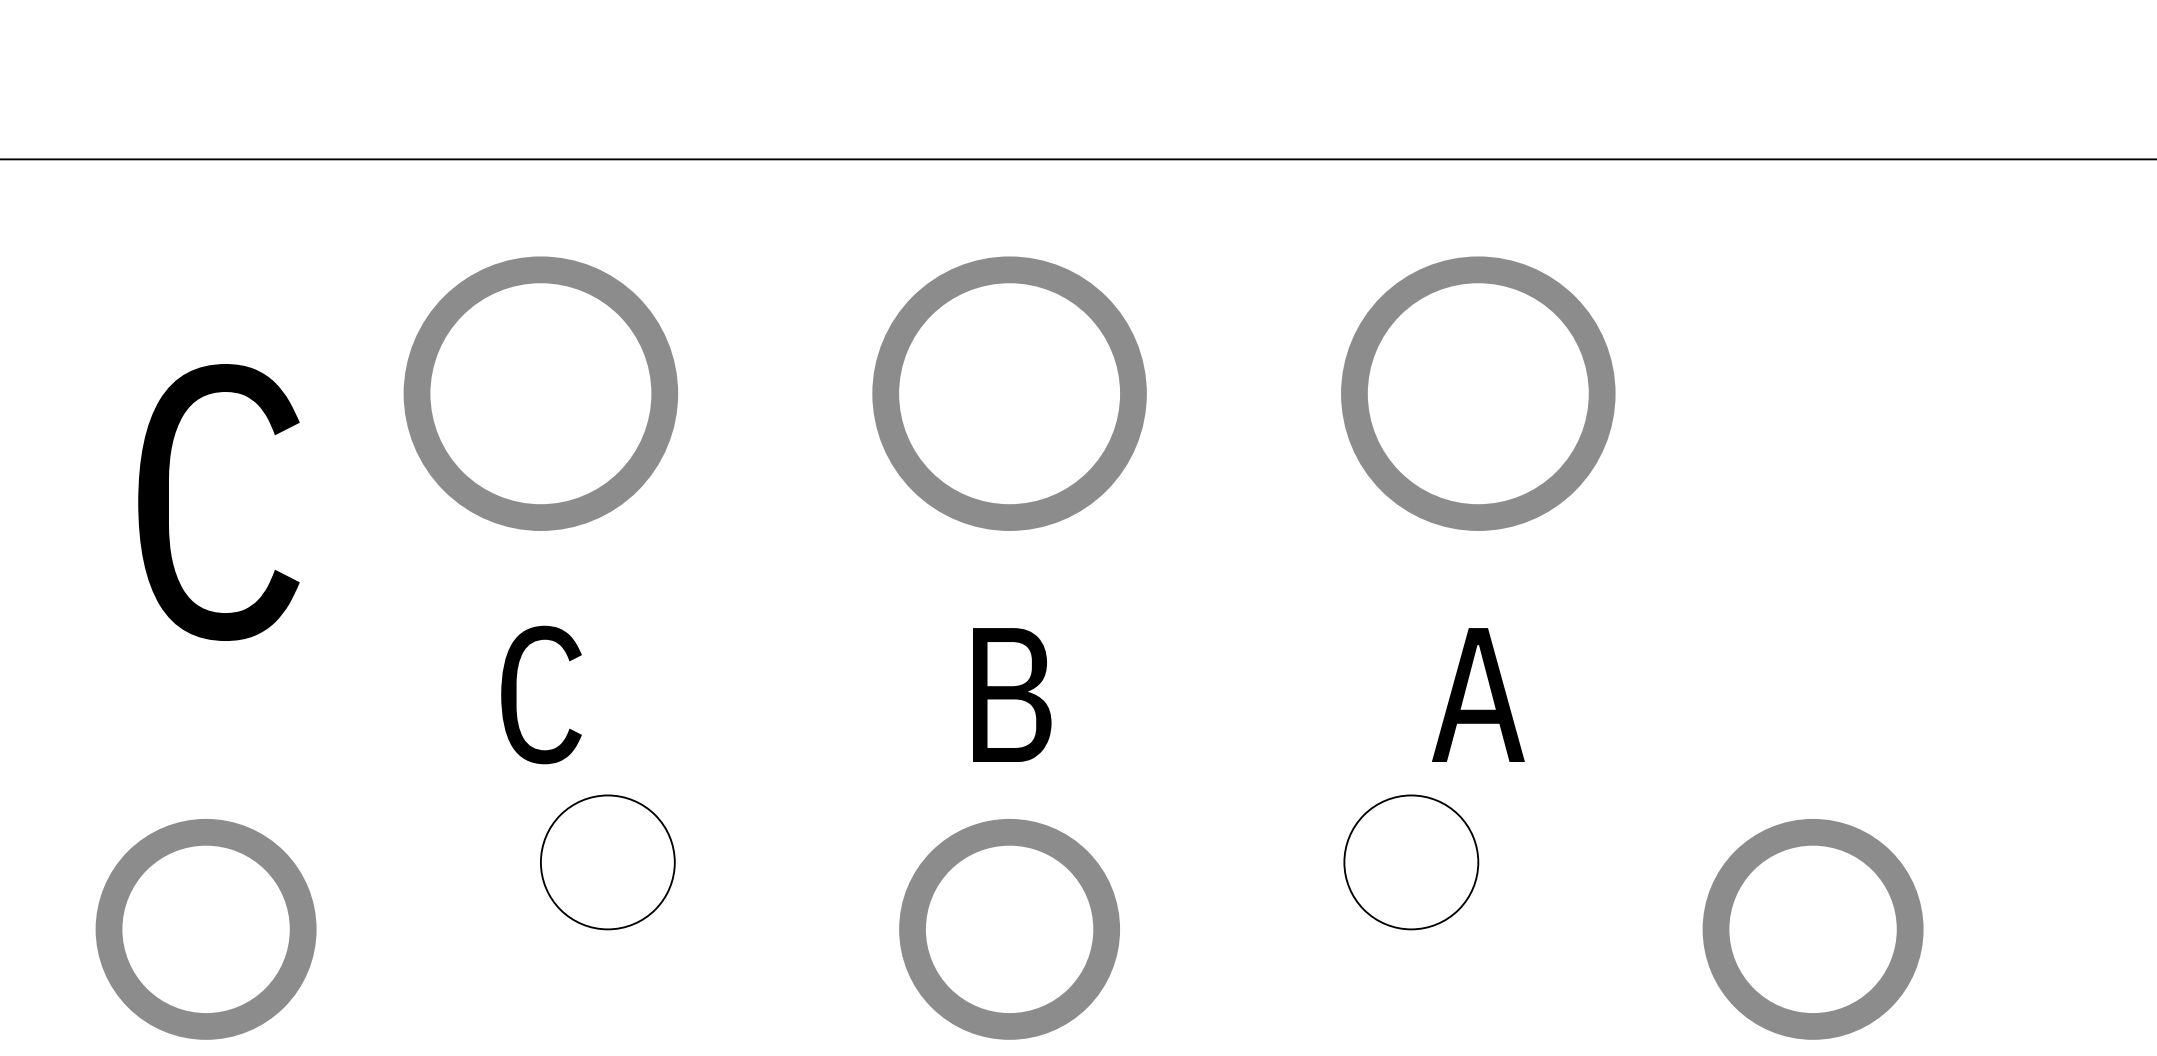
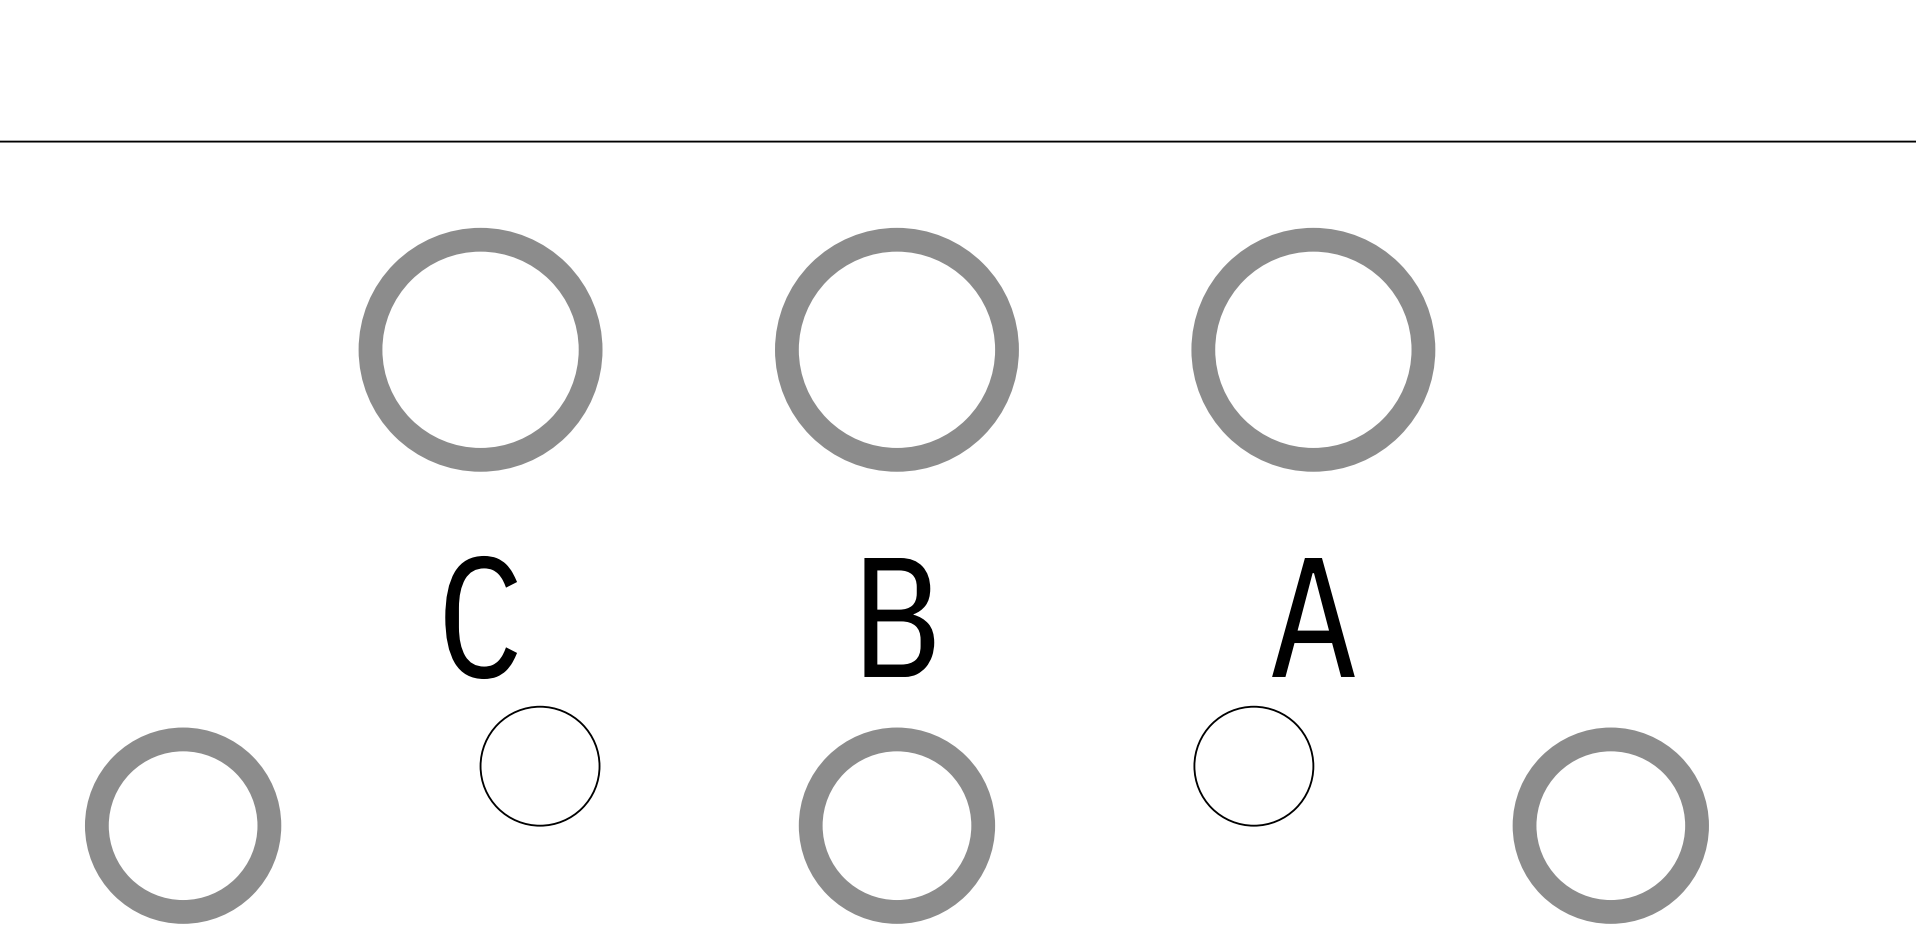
text: C (219, 502) -> none

